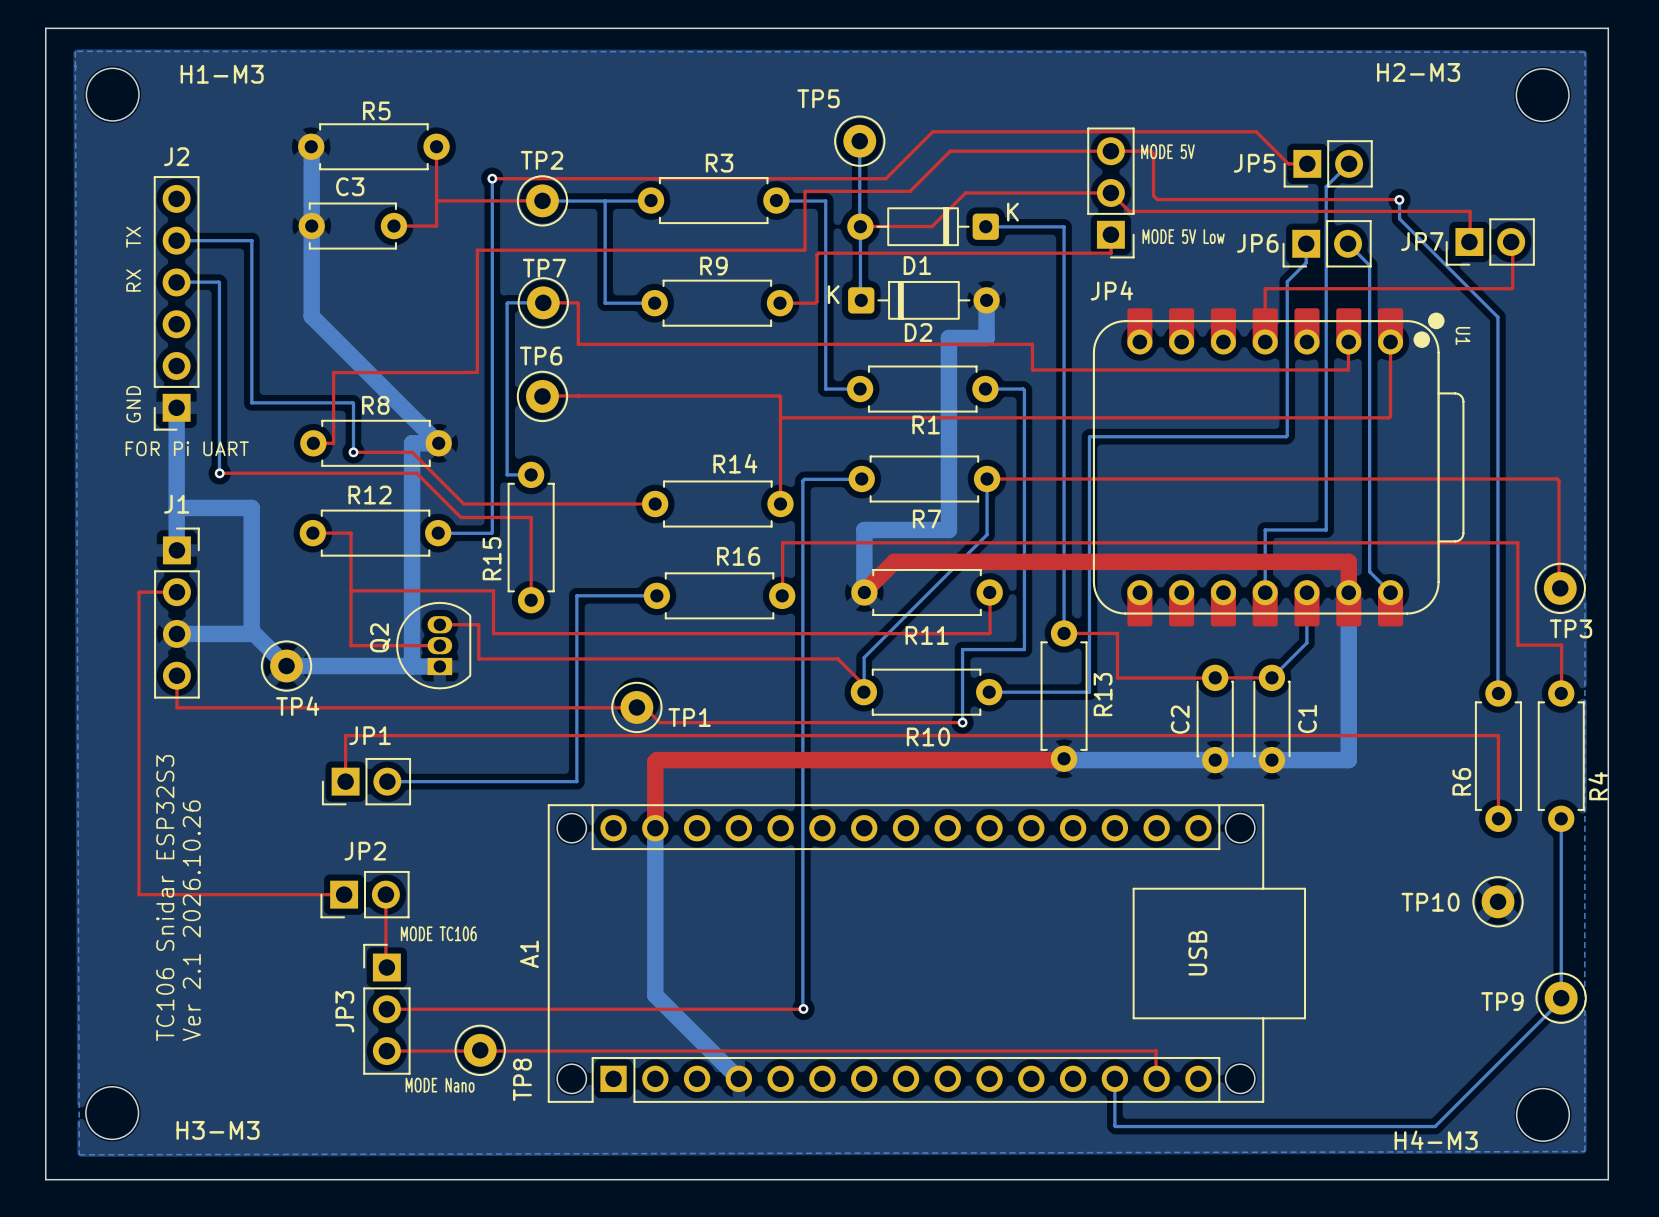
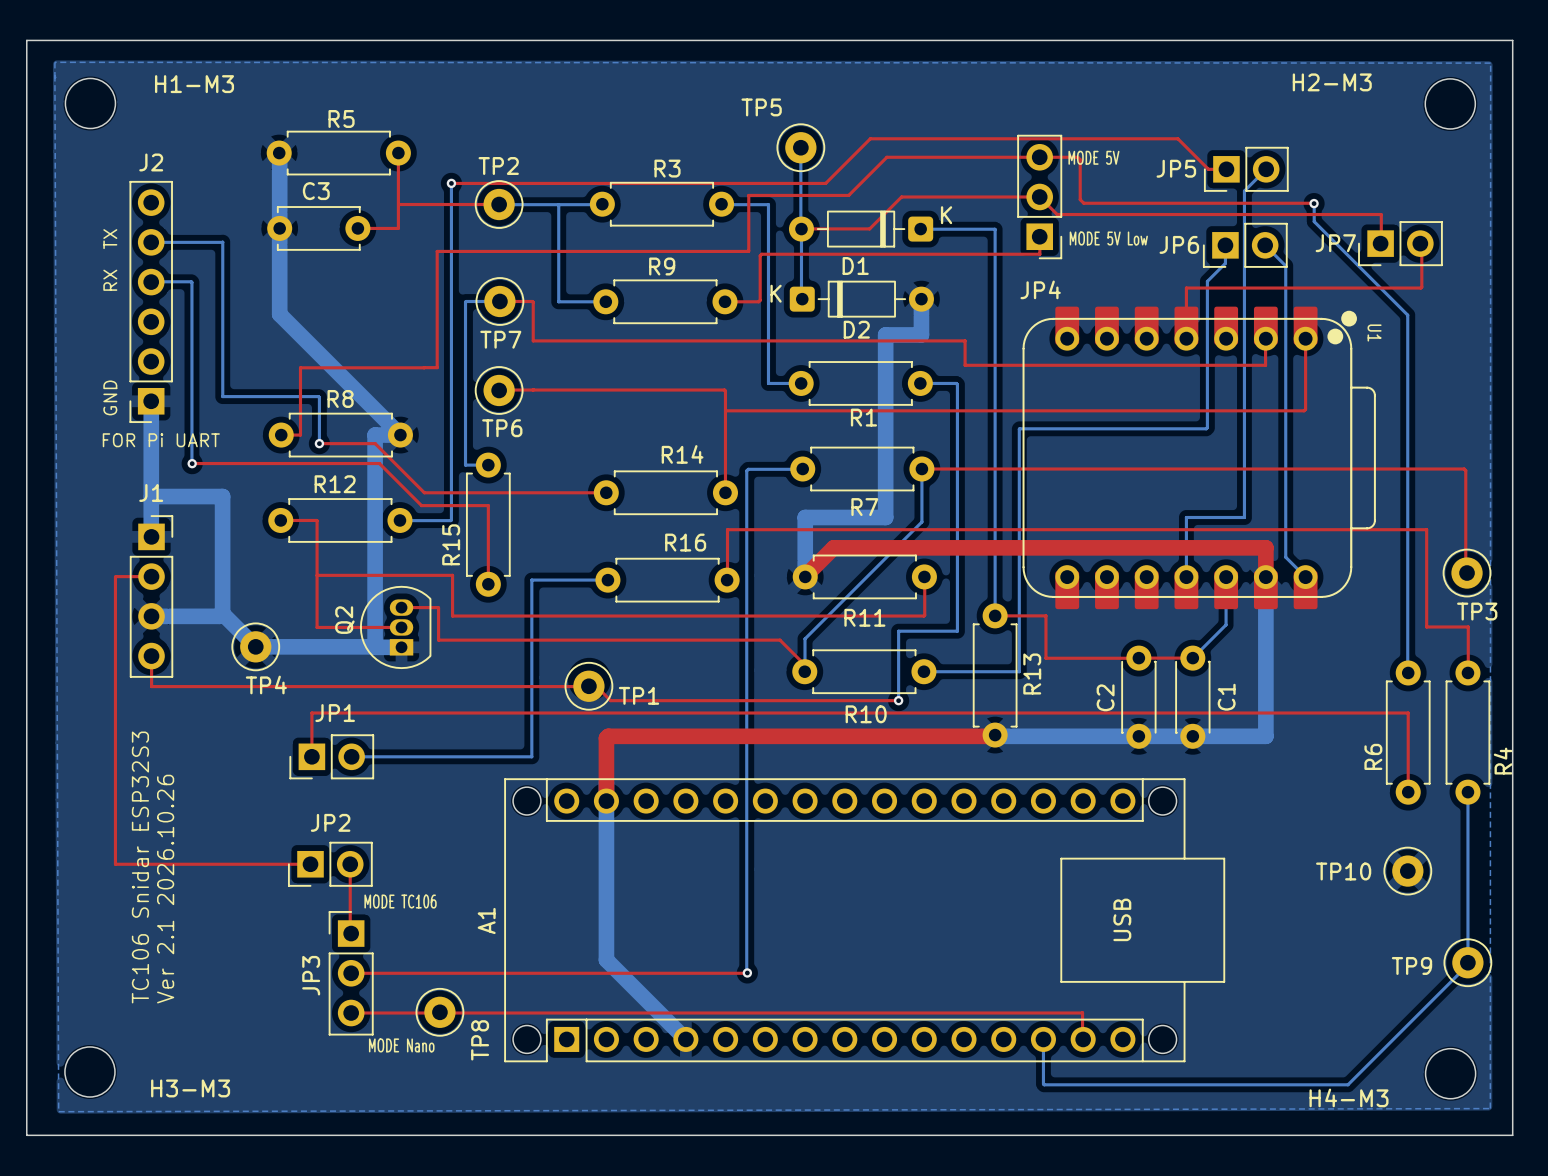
TP7 name position: TP7 (544, 268) -> TP7 (500, 339)
TP6 name position: TP6 (541, 356) -> TP6 (502, 428)

